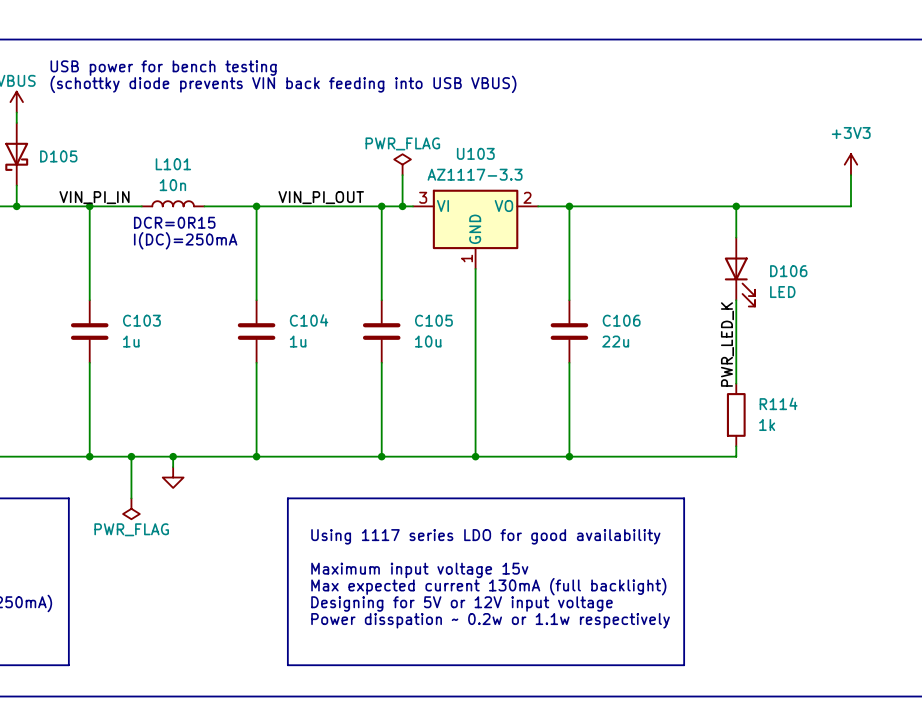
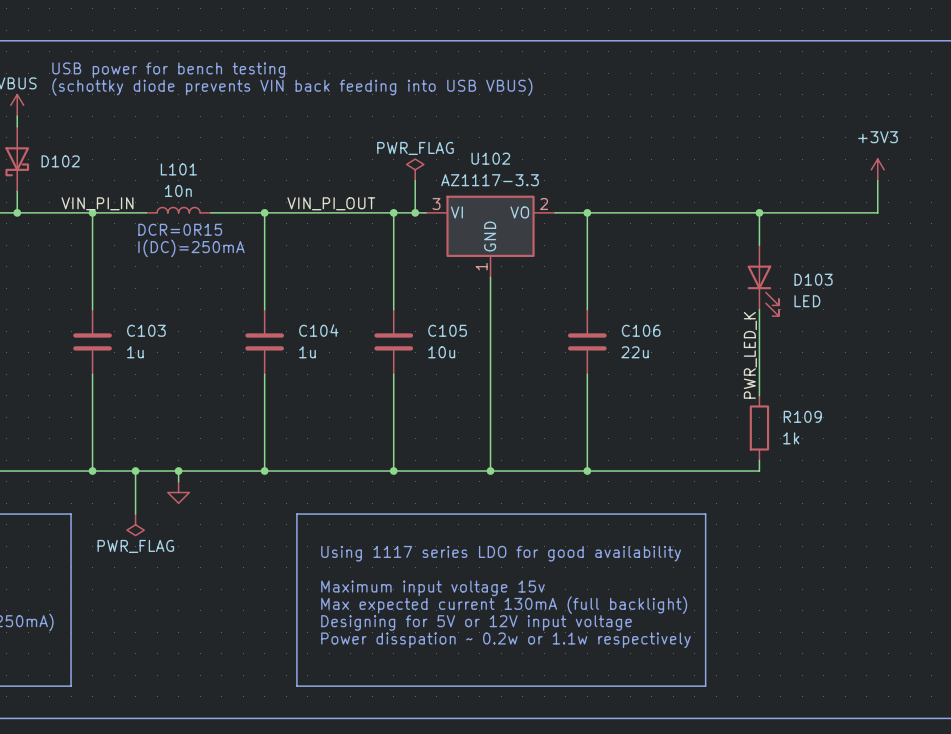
U103 name: U103 (475, 153) -> U102 (490, 158)
D105 name: D105 (58, 156) -> D102 (60, 161)
D106 name: D106 (788, 271) -> D103 (813, 279)
R114 name: R114 (778, 403) -> R109 (802, 416)

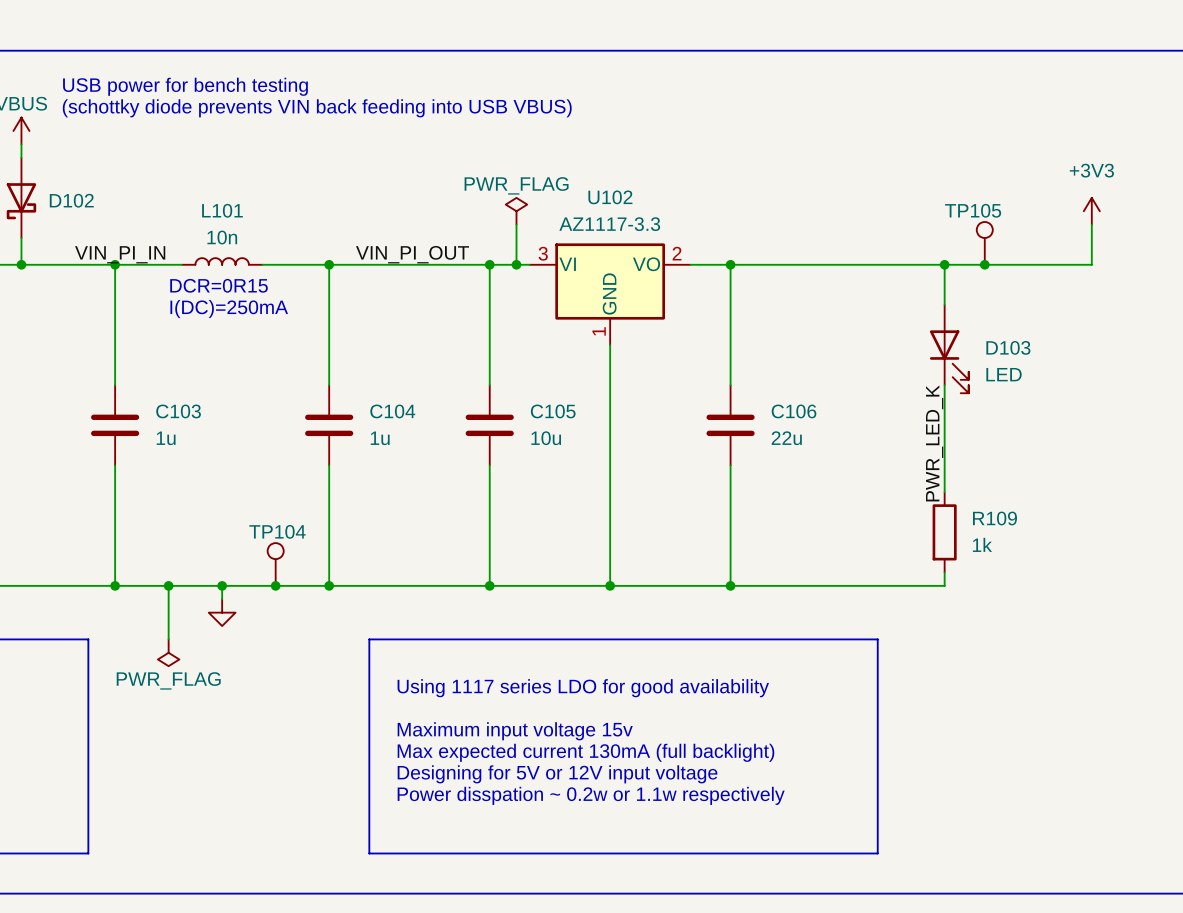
TP105: none -> (984, 243)
junction: none -> (984, 264)
TP104: none -> (275, 564)
junction: none -> (275, 585)

